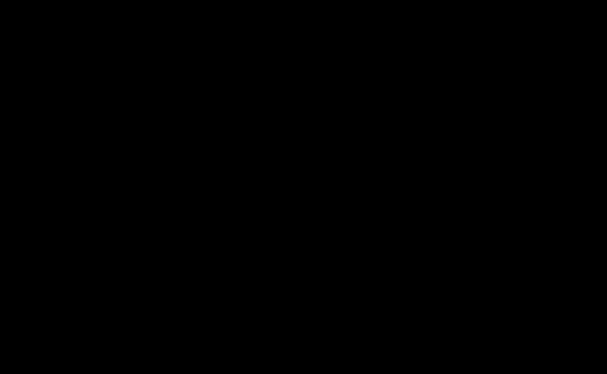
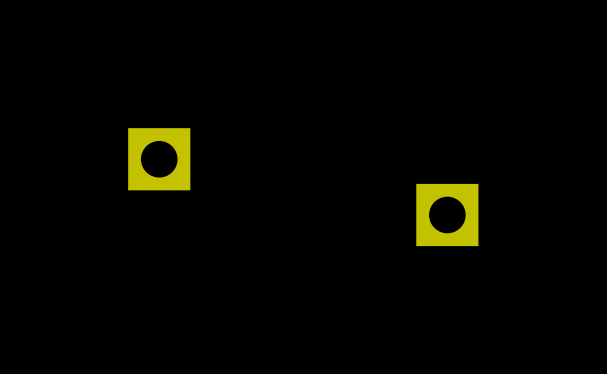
part: none -> (159, 159)
part: none -> (447, 215)

